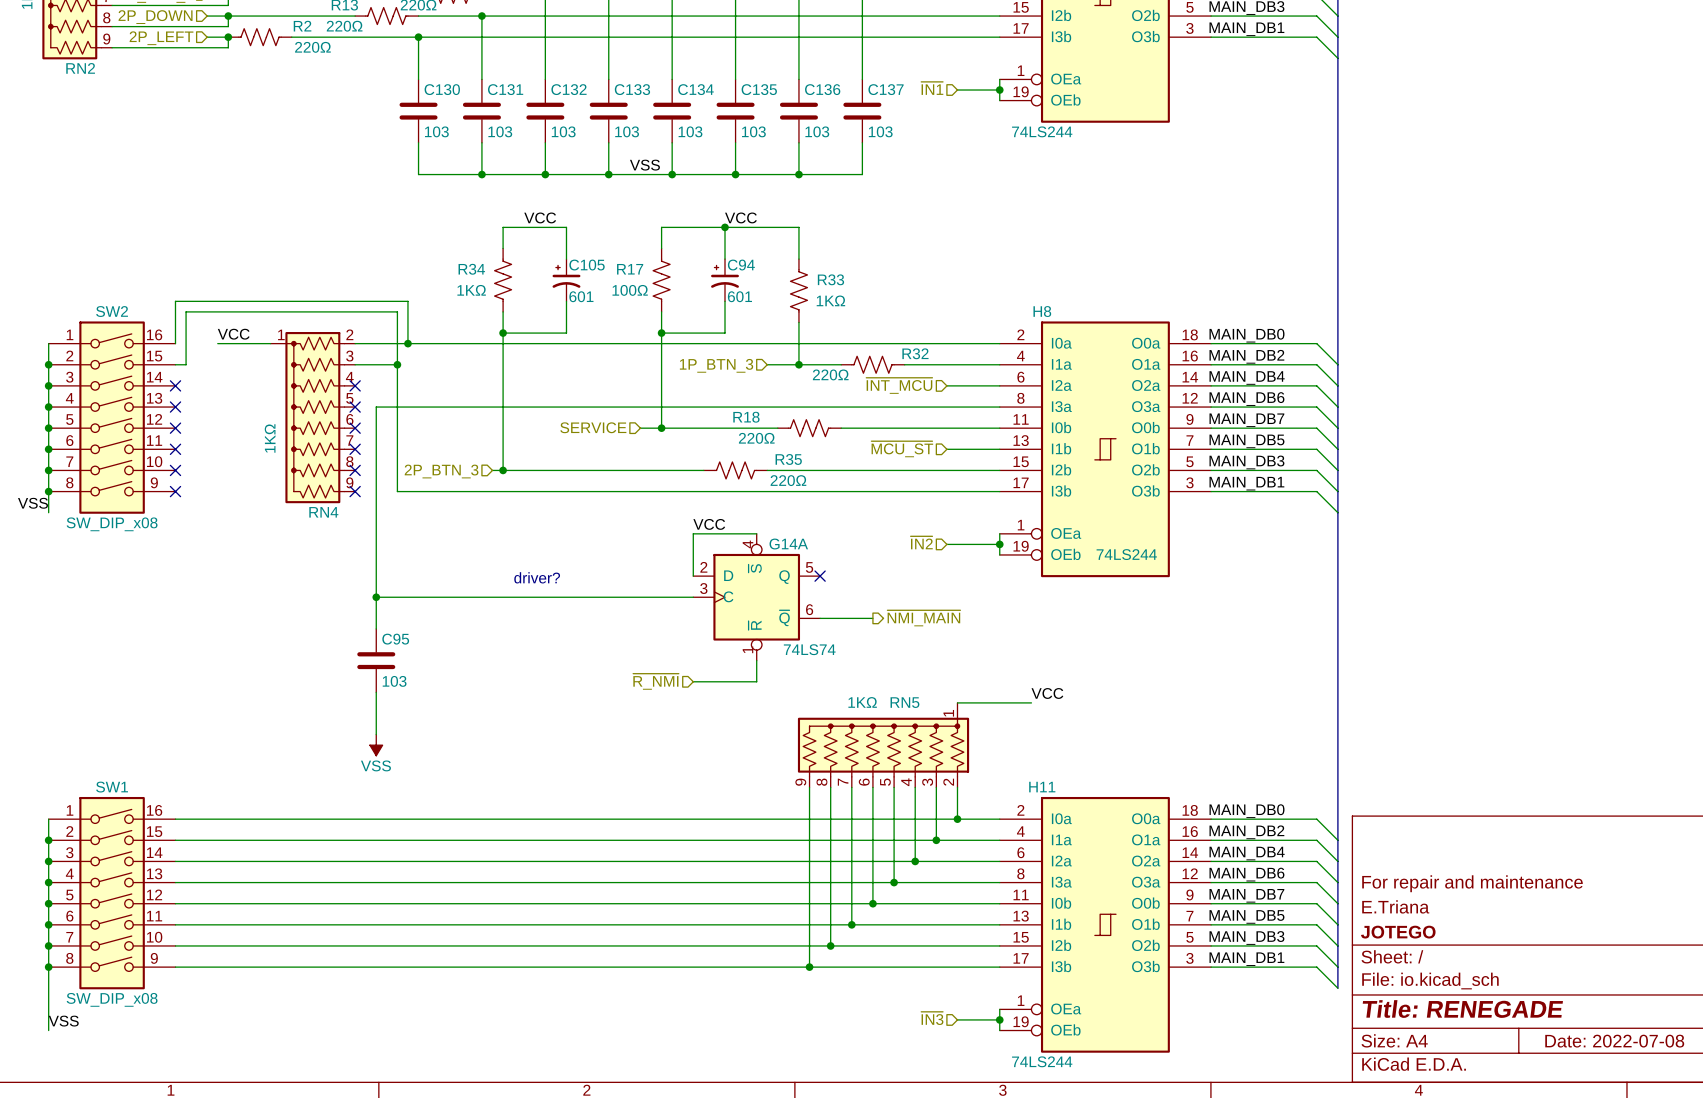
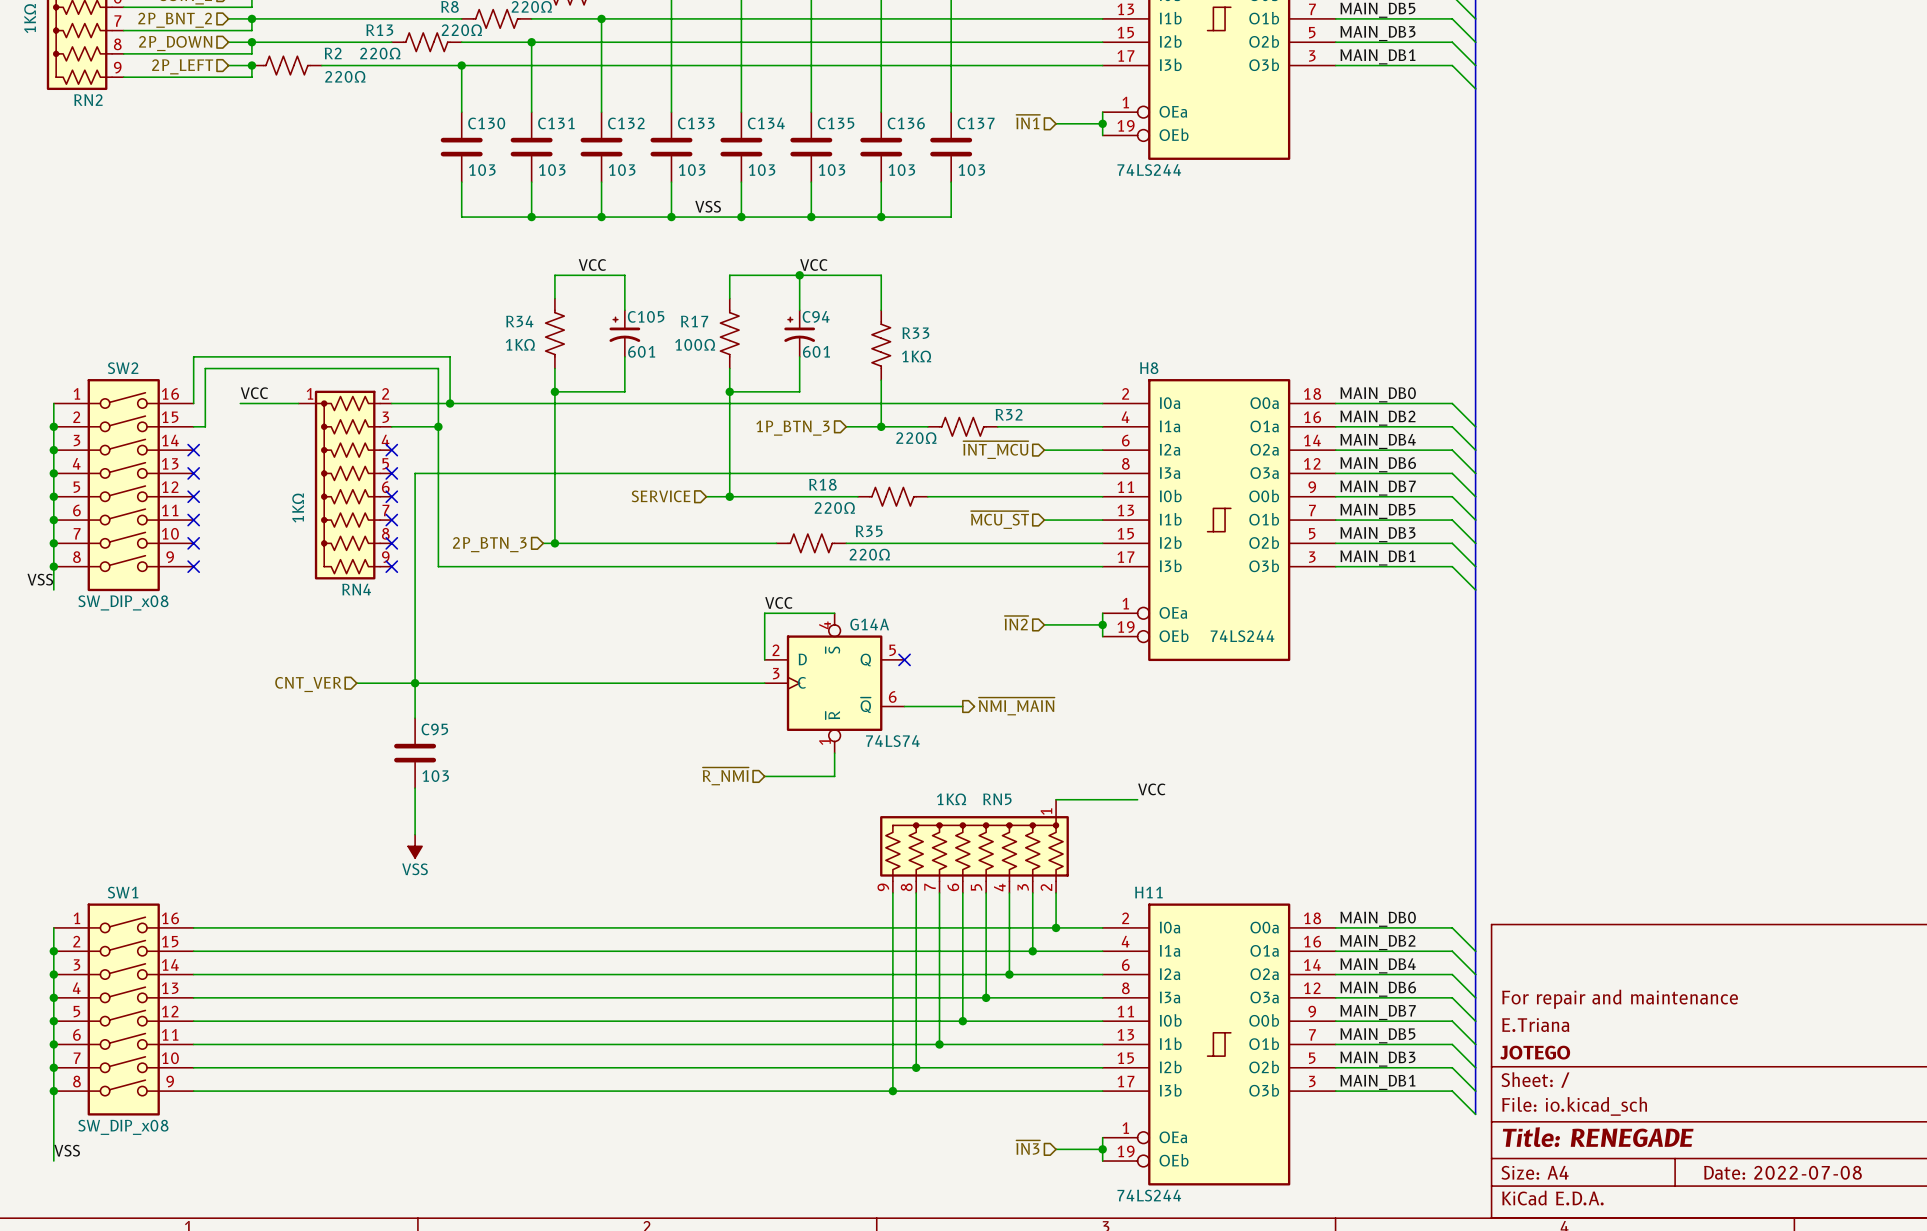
text: driver? (537, 577) -> none
wire: none -> (356, 683) (415, 683)
hierarchical label: none -> CNT_VER (308, 684)

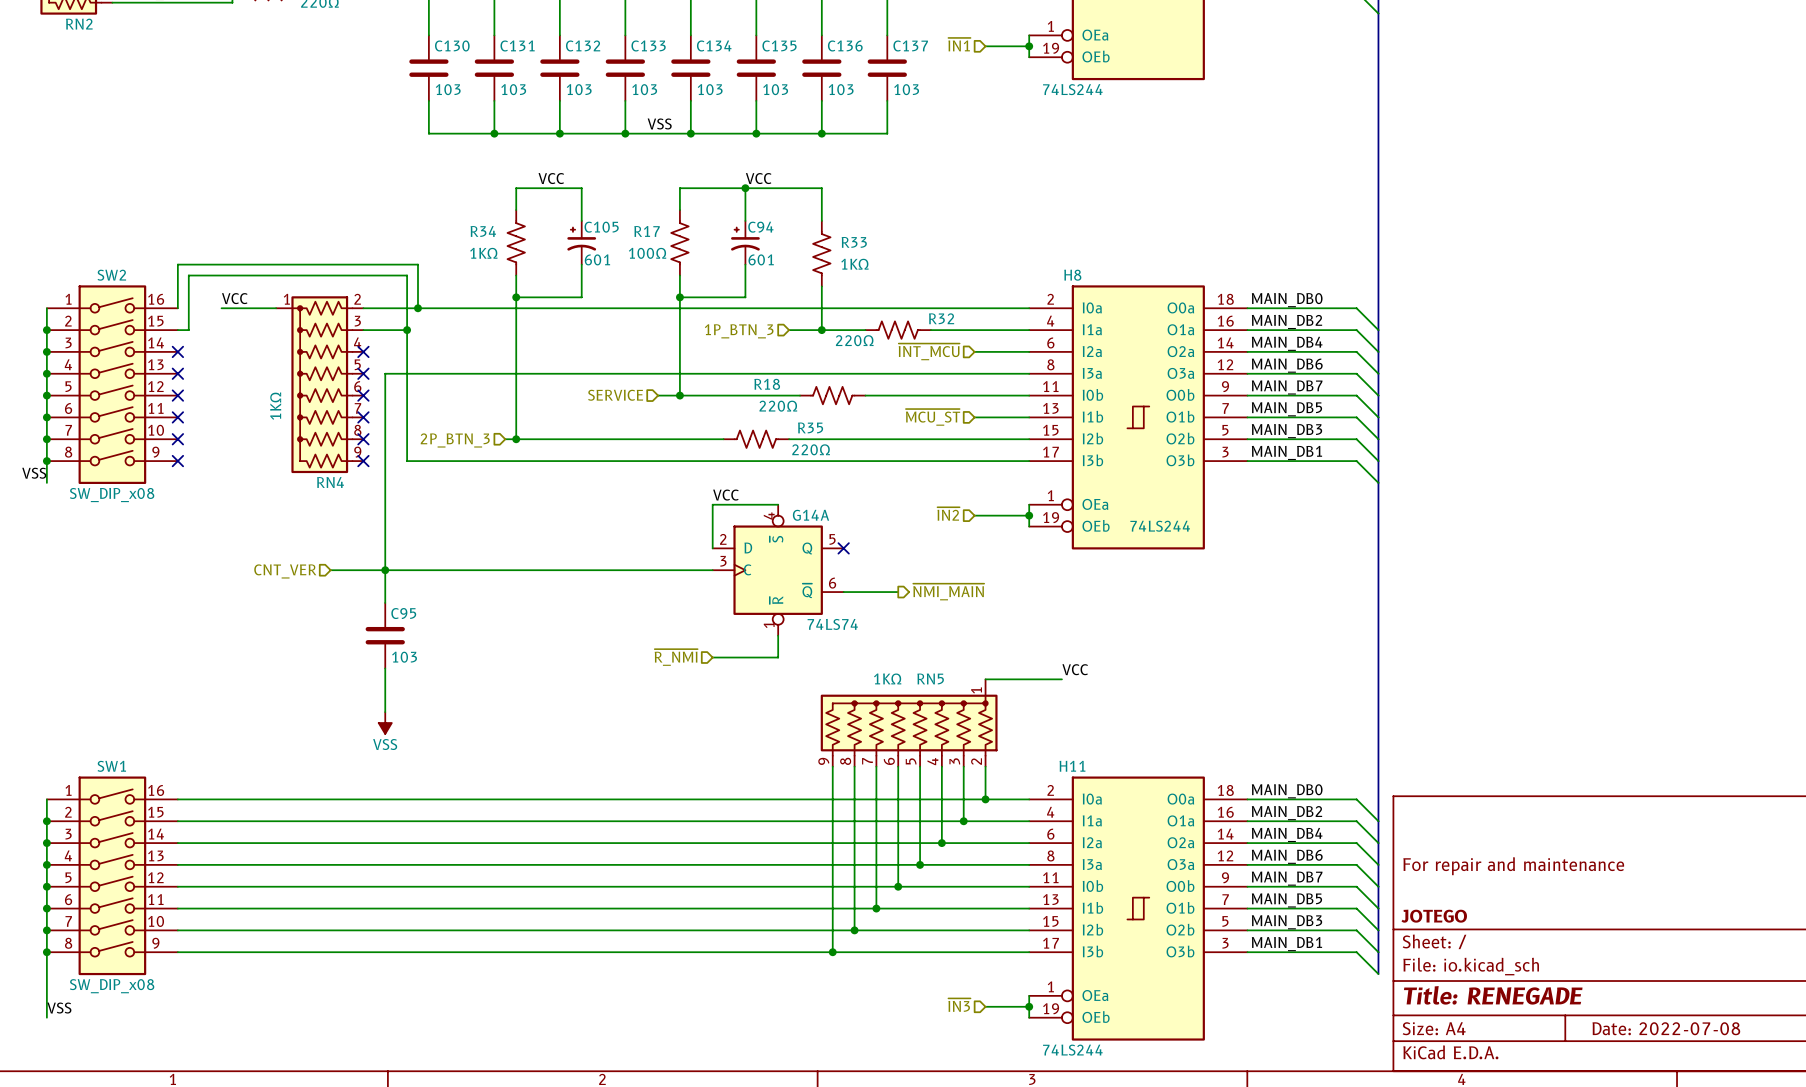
title block: E.Triana (1535, 1025) -> none

